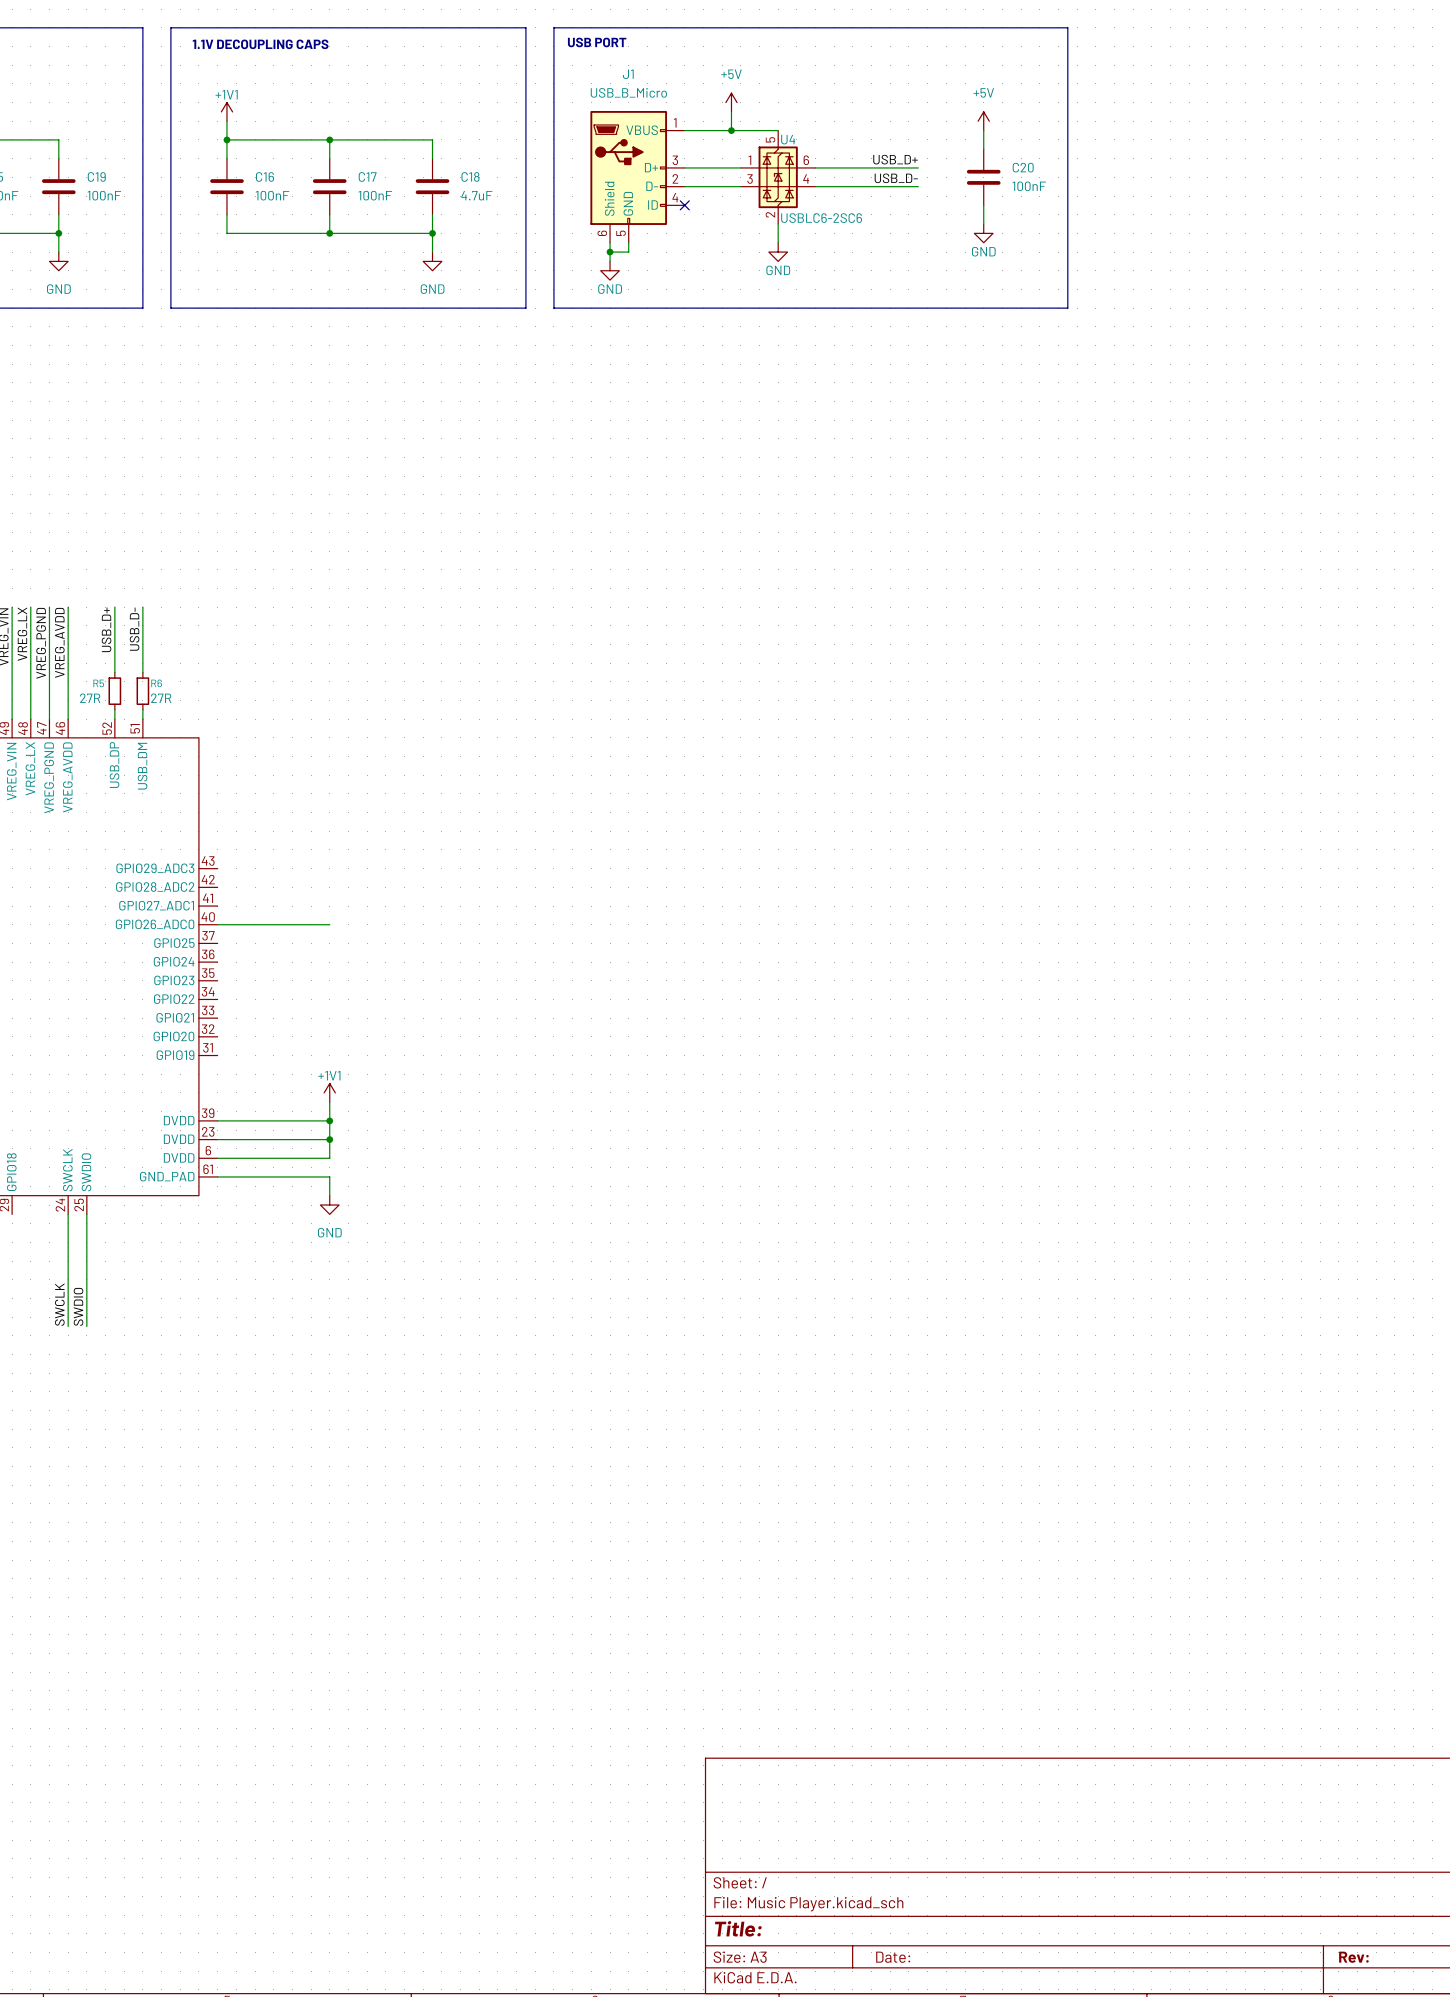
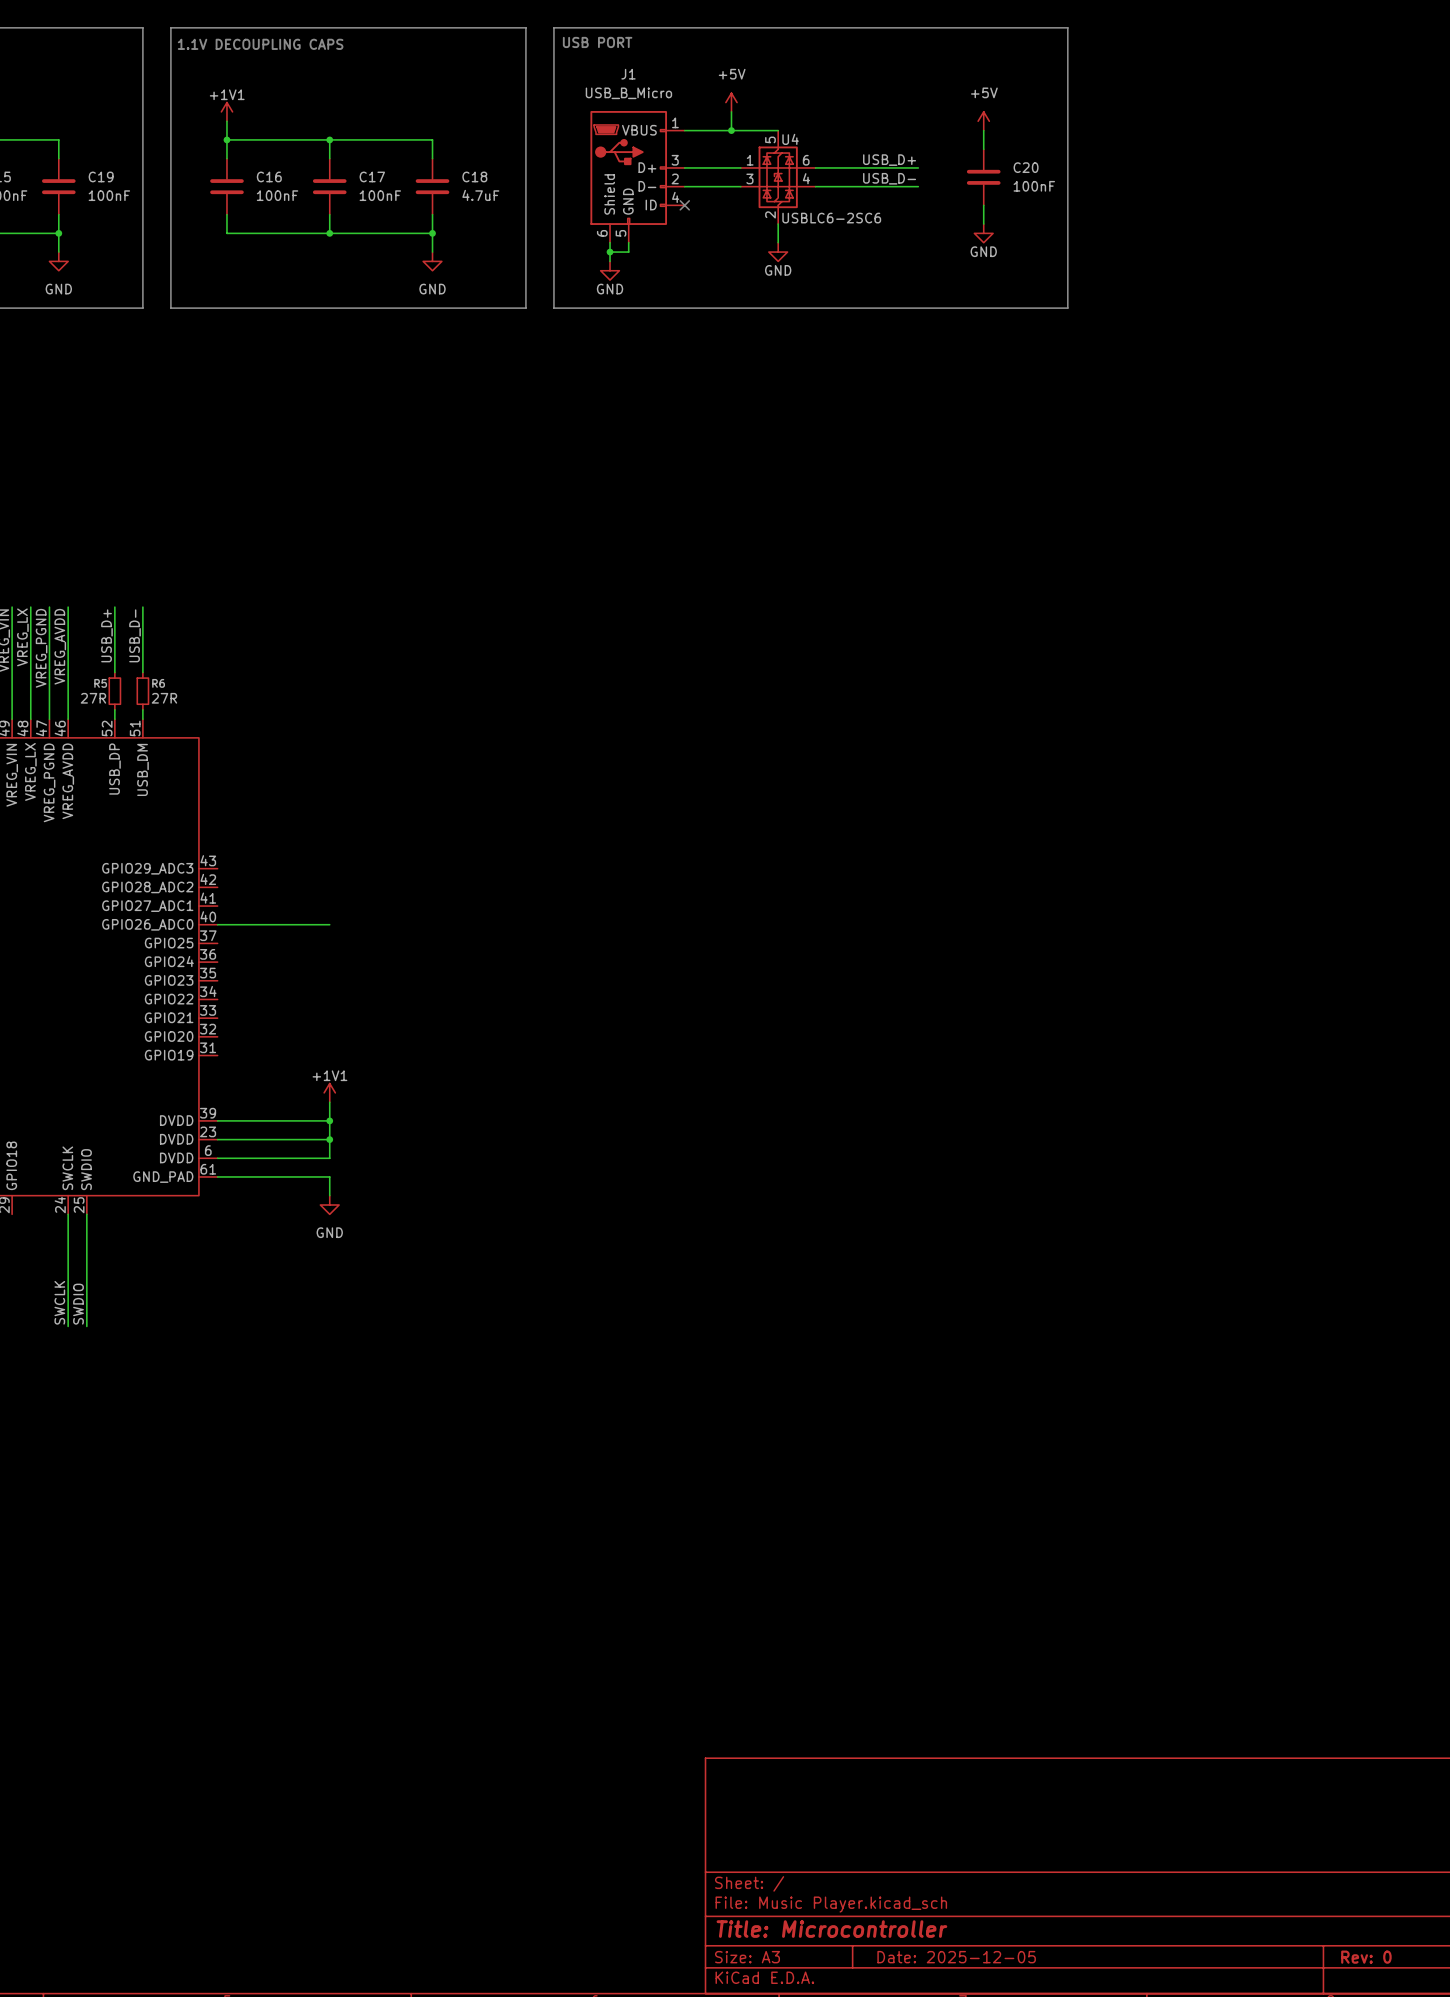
title block: Title: (738, 1928) -> Title: Microcontroller (831, 1929)
title block: Date: (893, 1957) -> Date: 2025-12-05 (956, 1957)
title block: Rev: (1353, 1957) -> Rev: 0 (1366, 1957)

